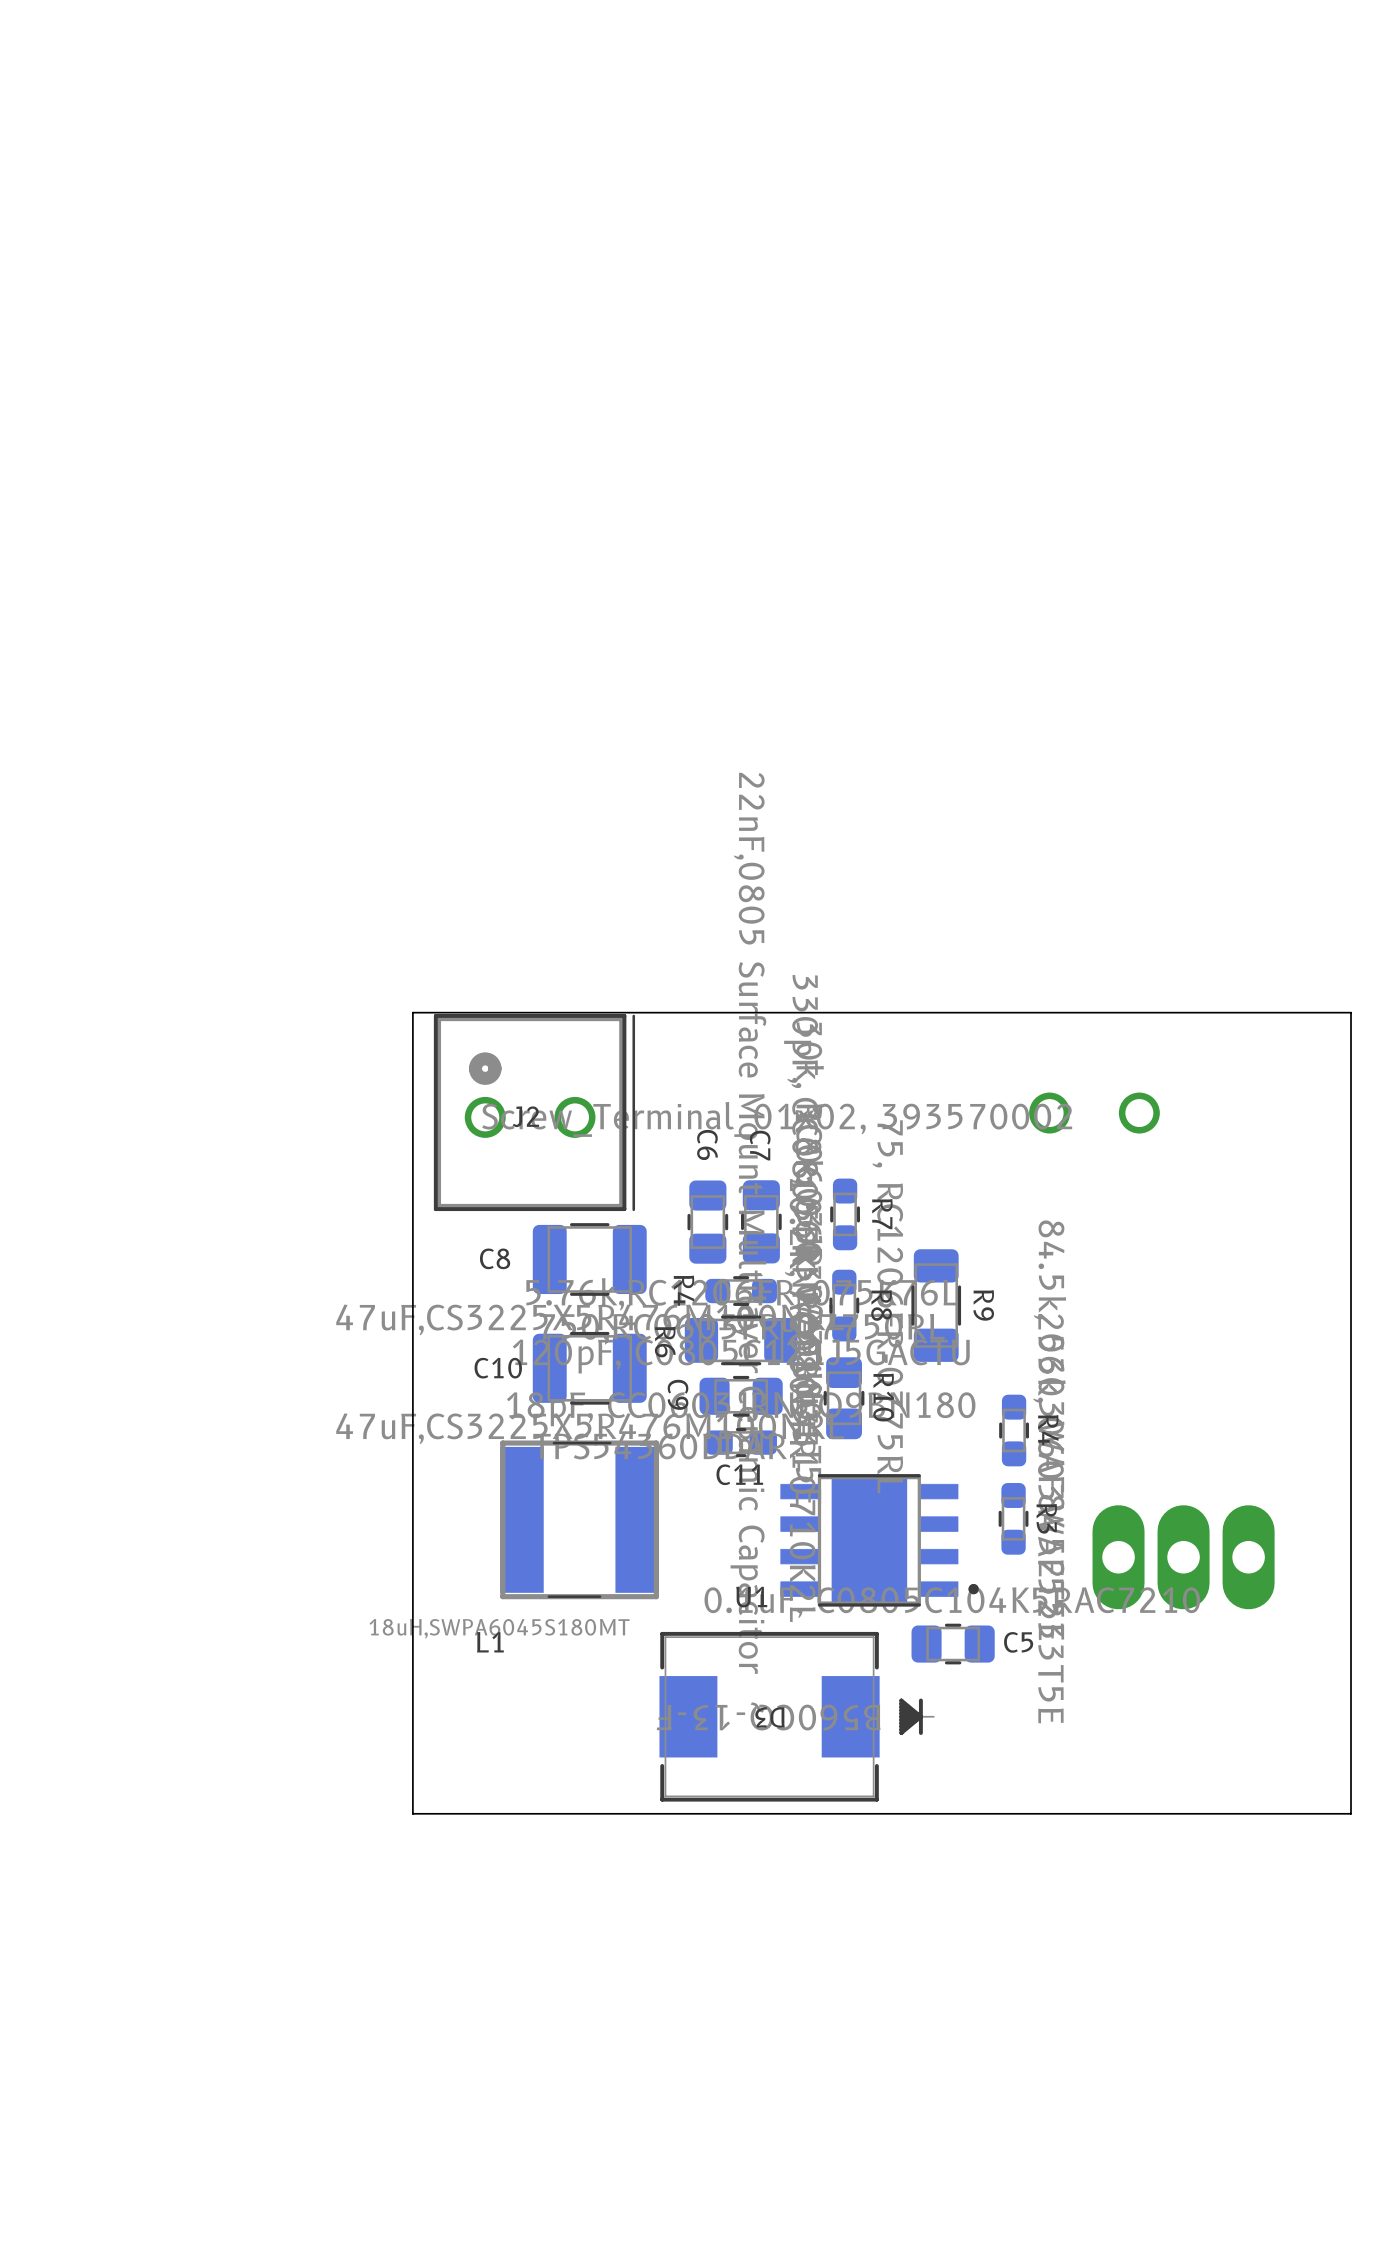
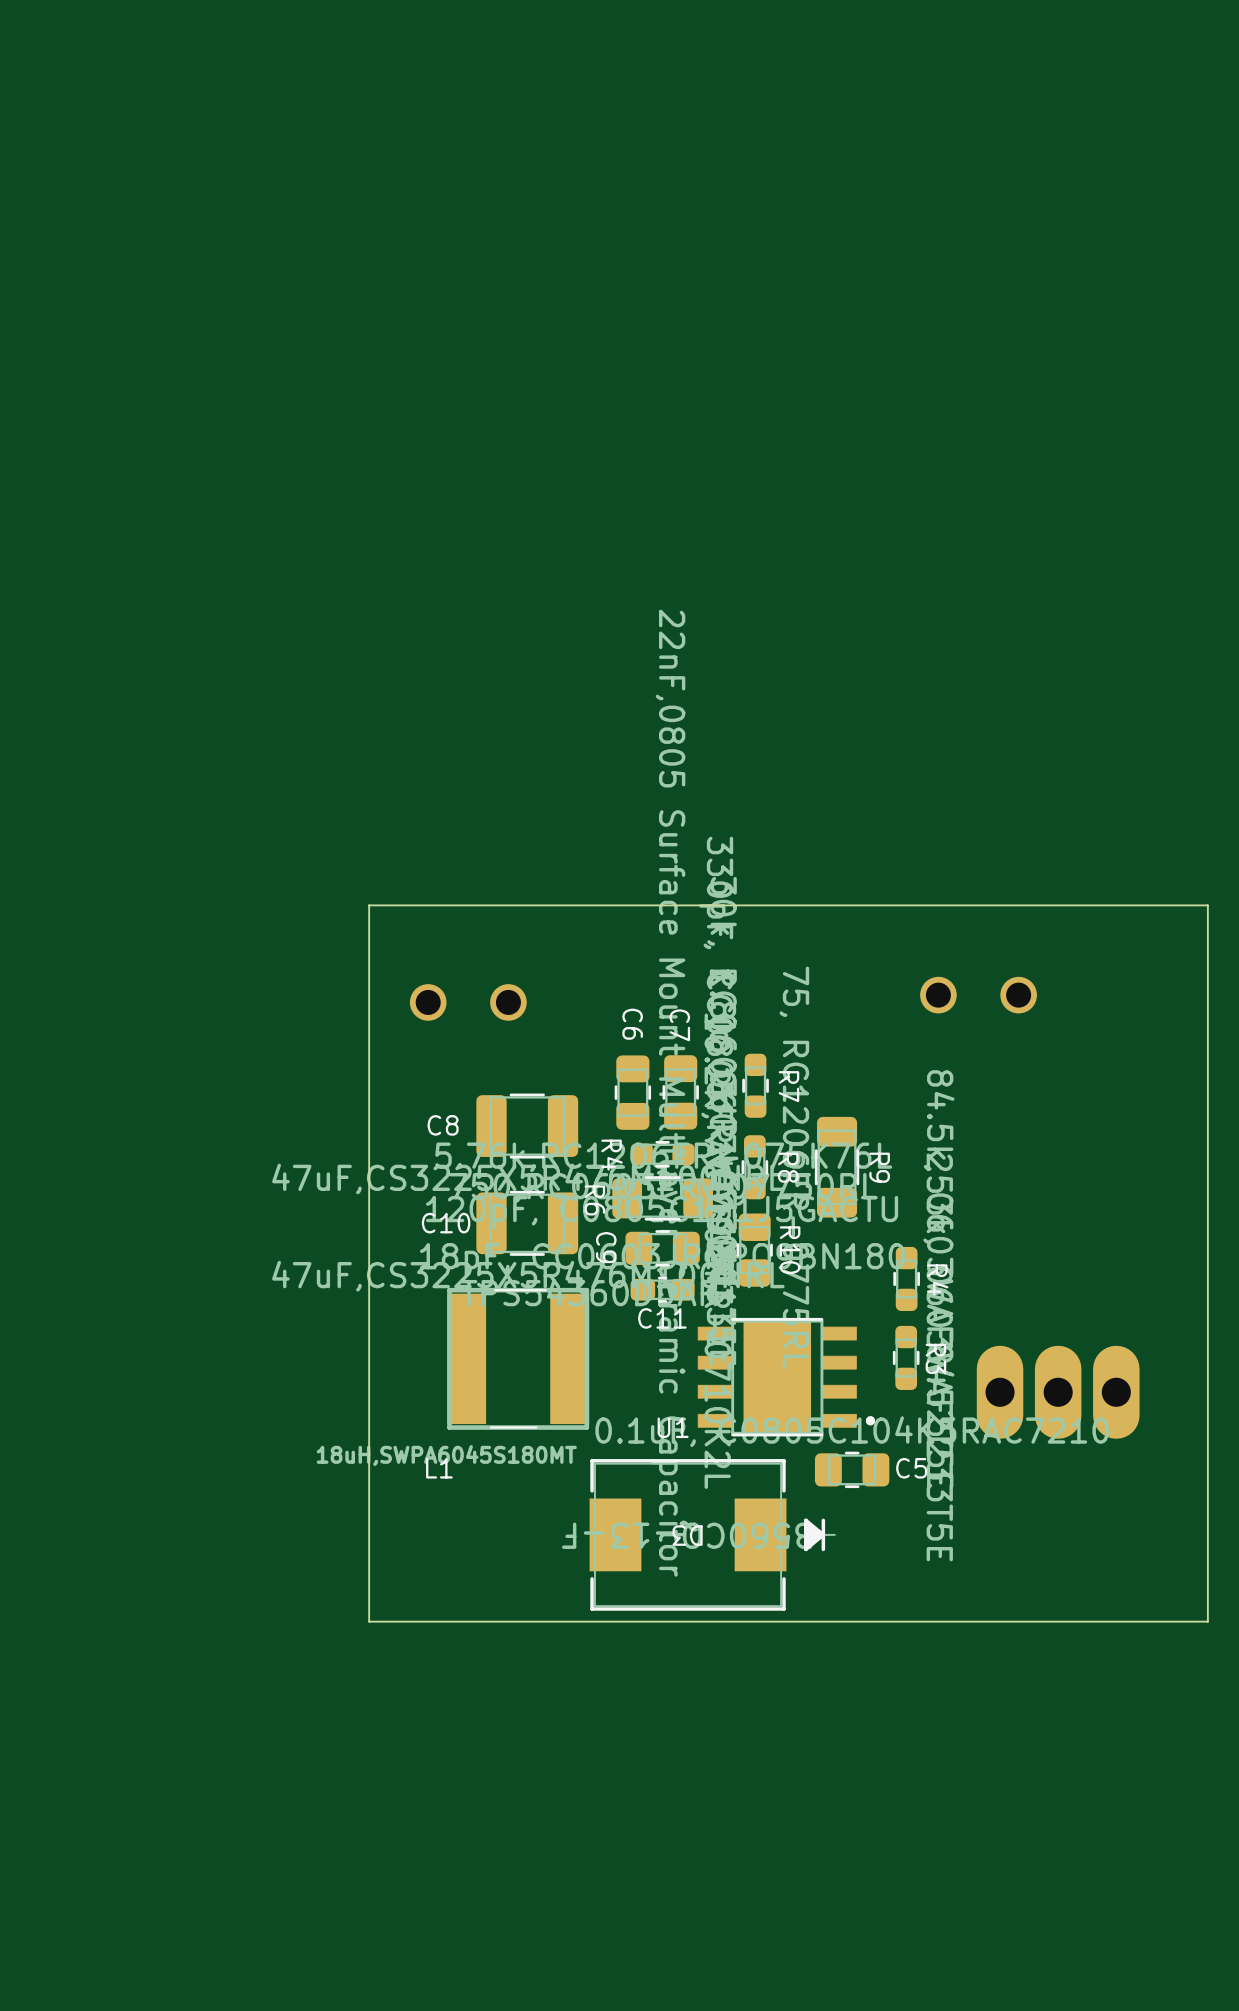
J2 side: bottom (534, 1112) -> top (468, 1002)

